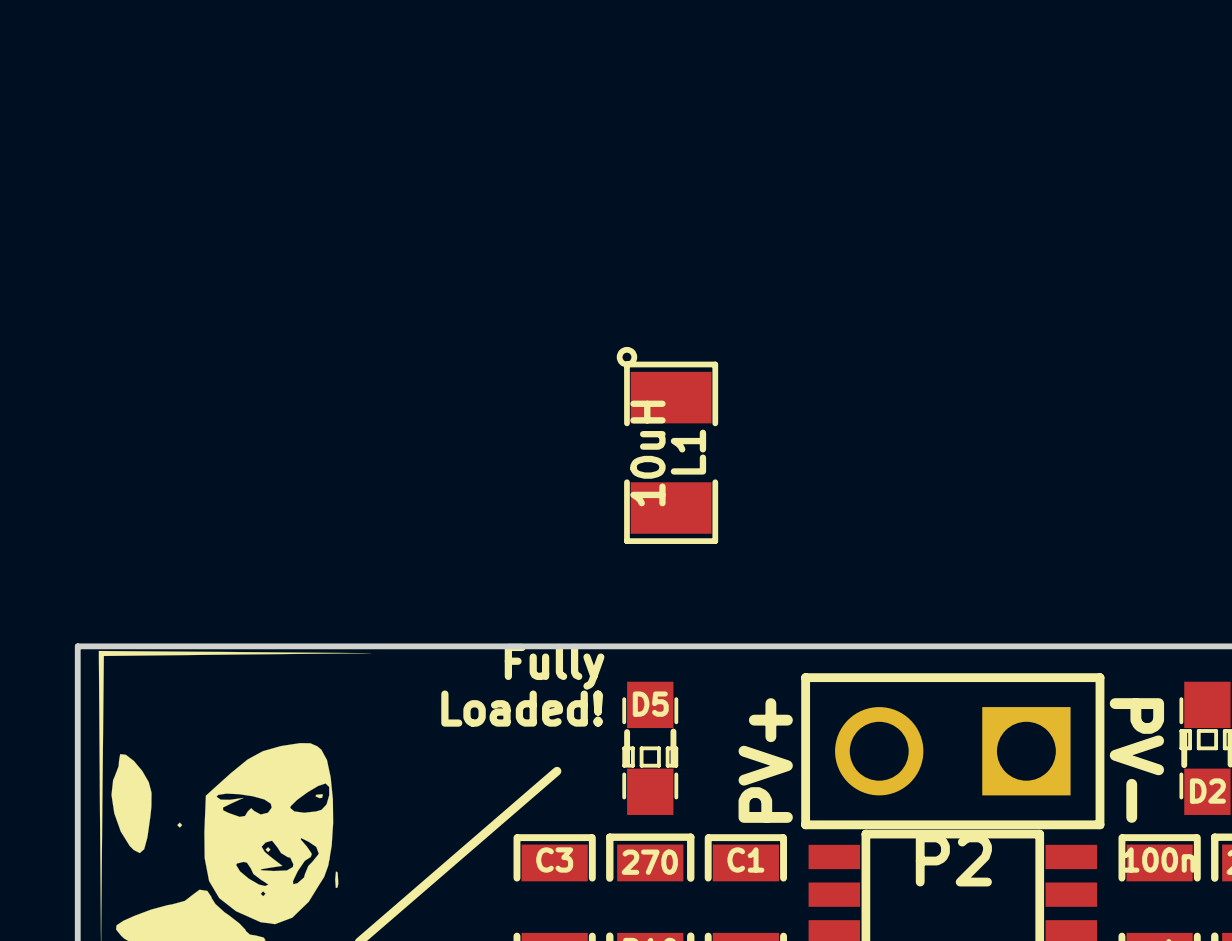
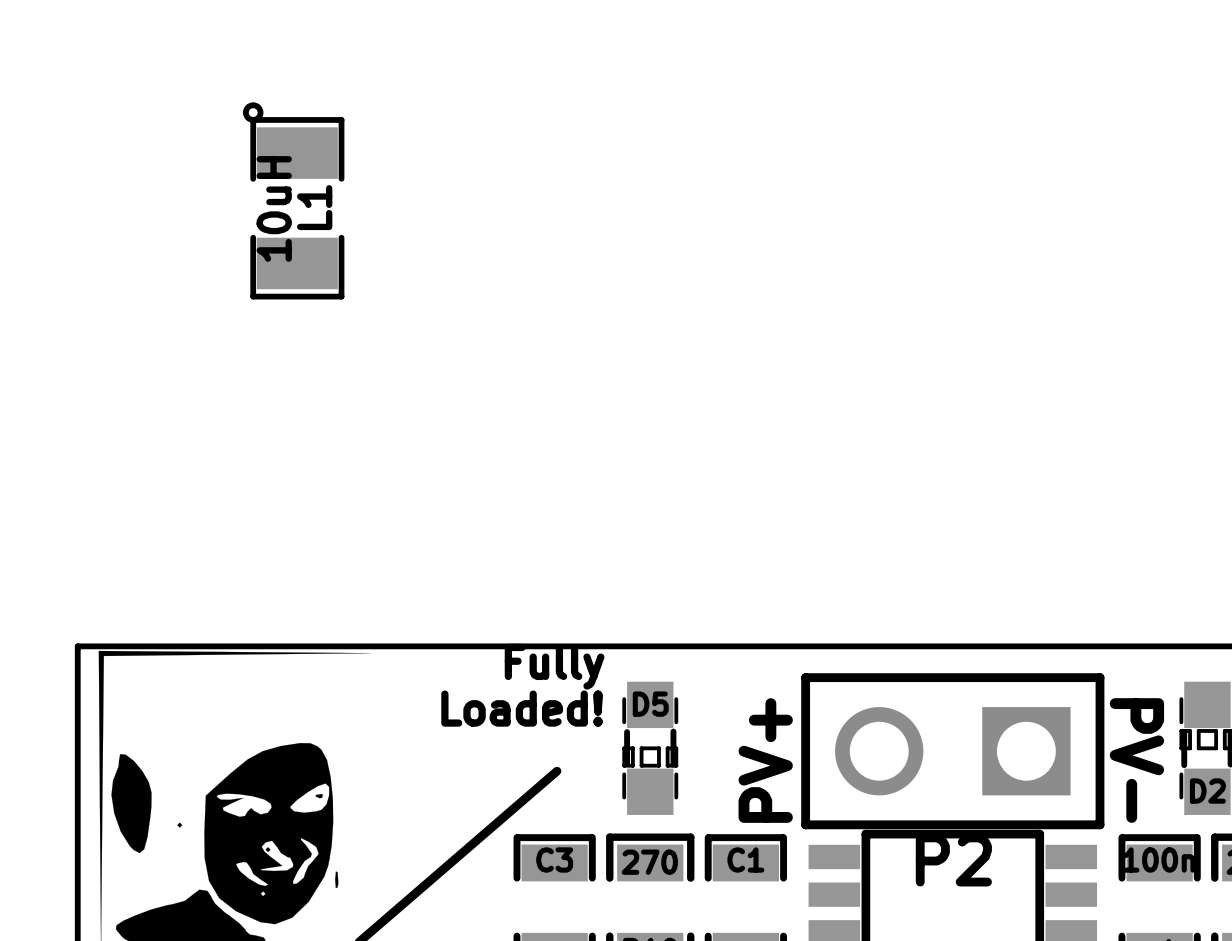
L1 position: (667, 445) -> (293, 200)

